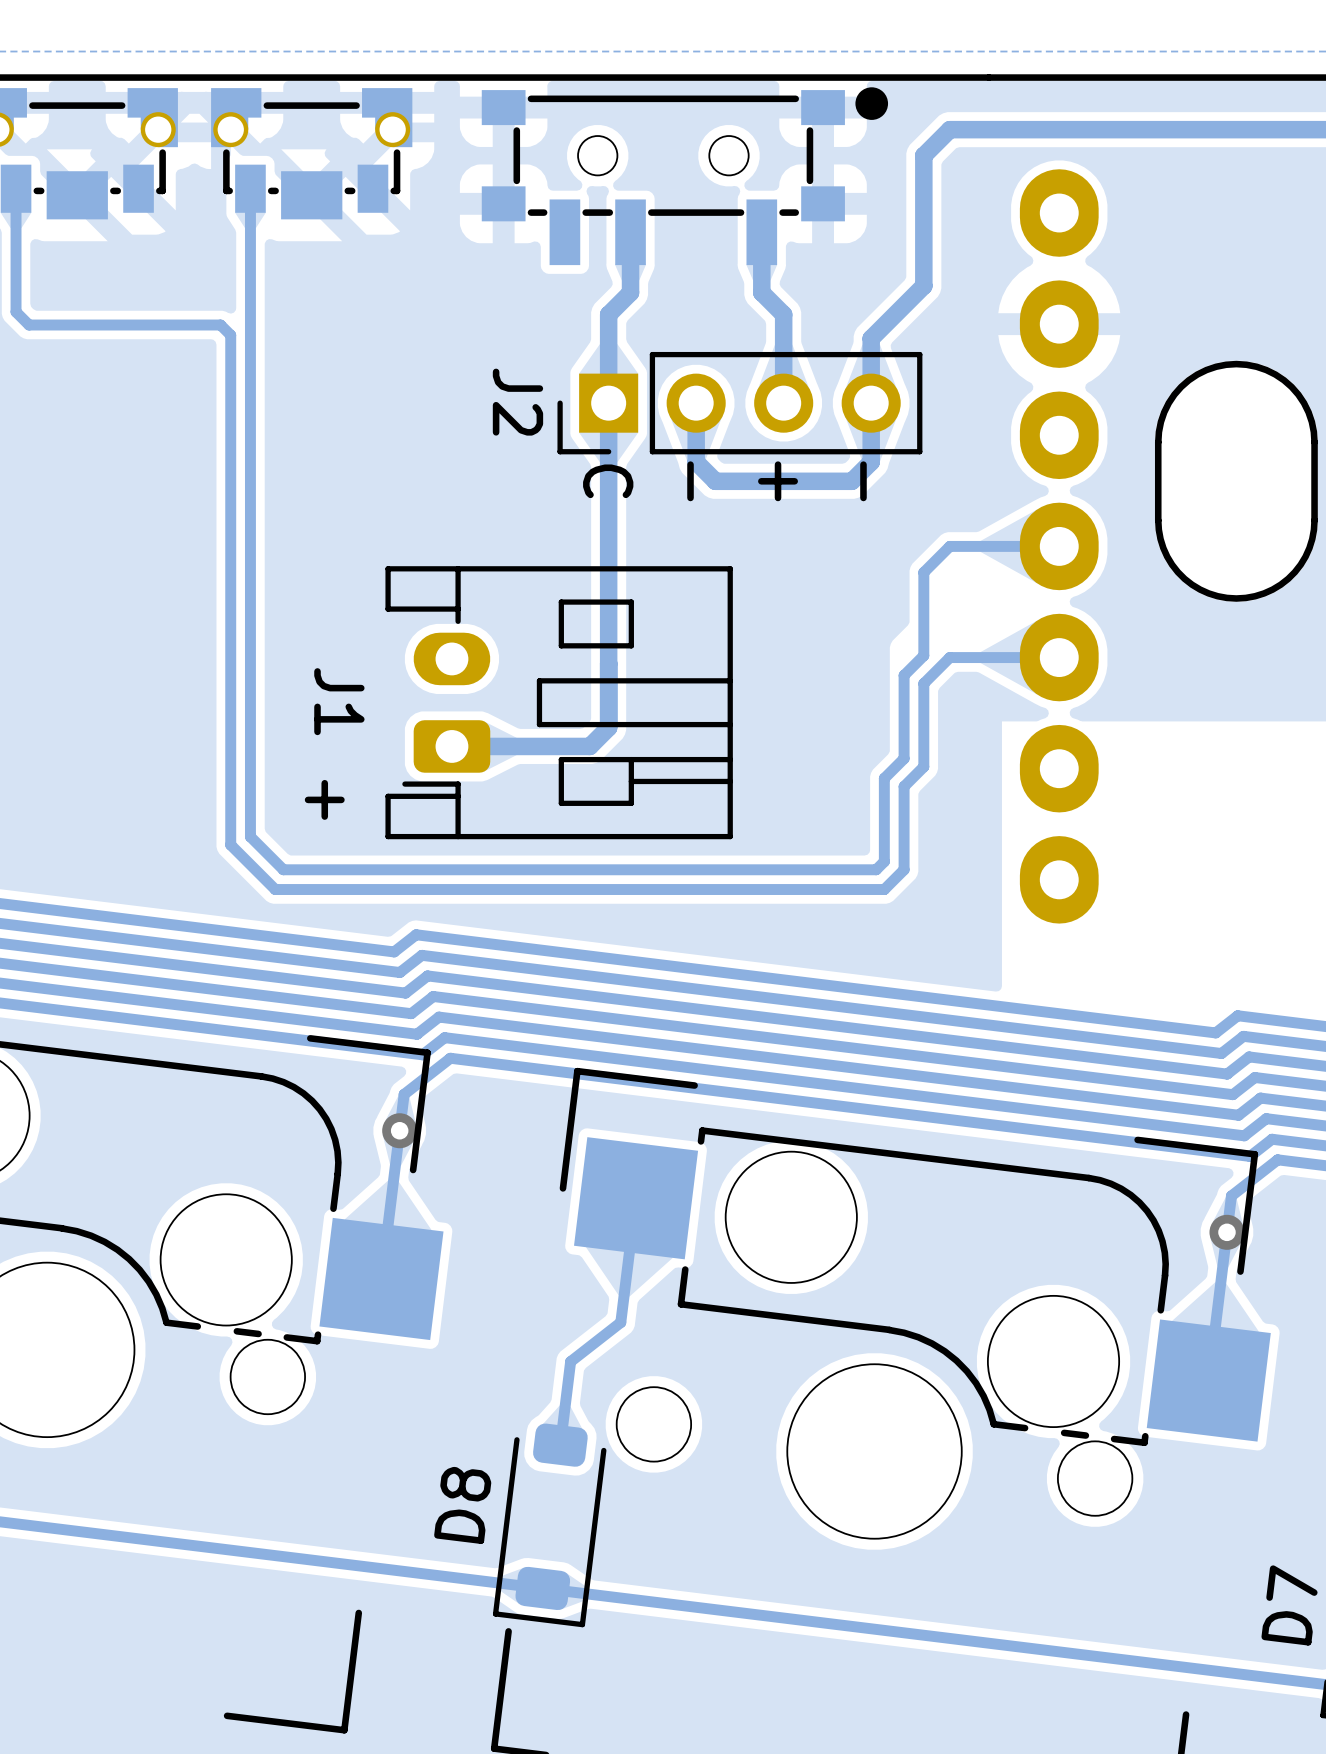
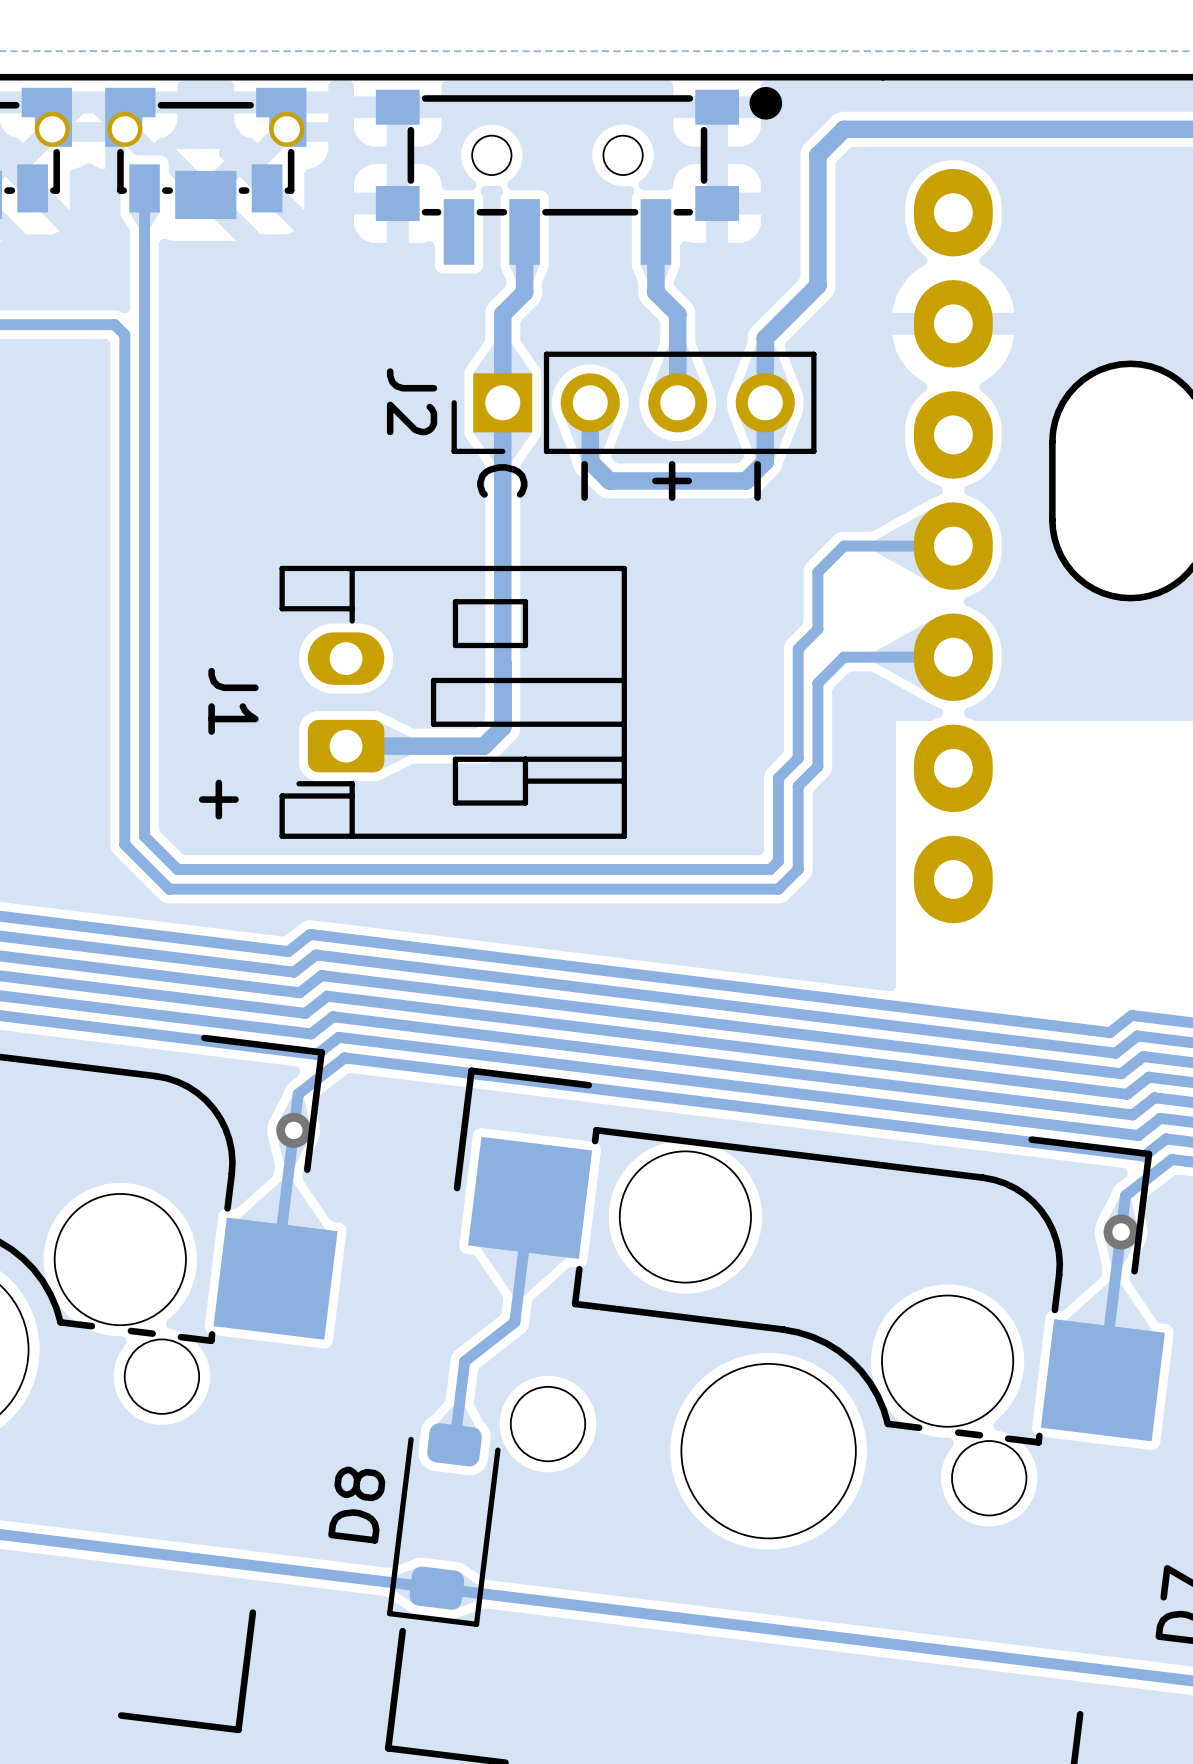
track: (923, 629) (923, 655) (904, 675) -> (817, 629) (798, 649) (798, 675)

